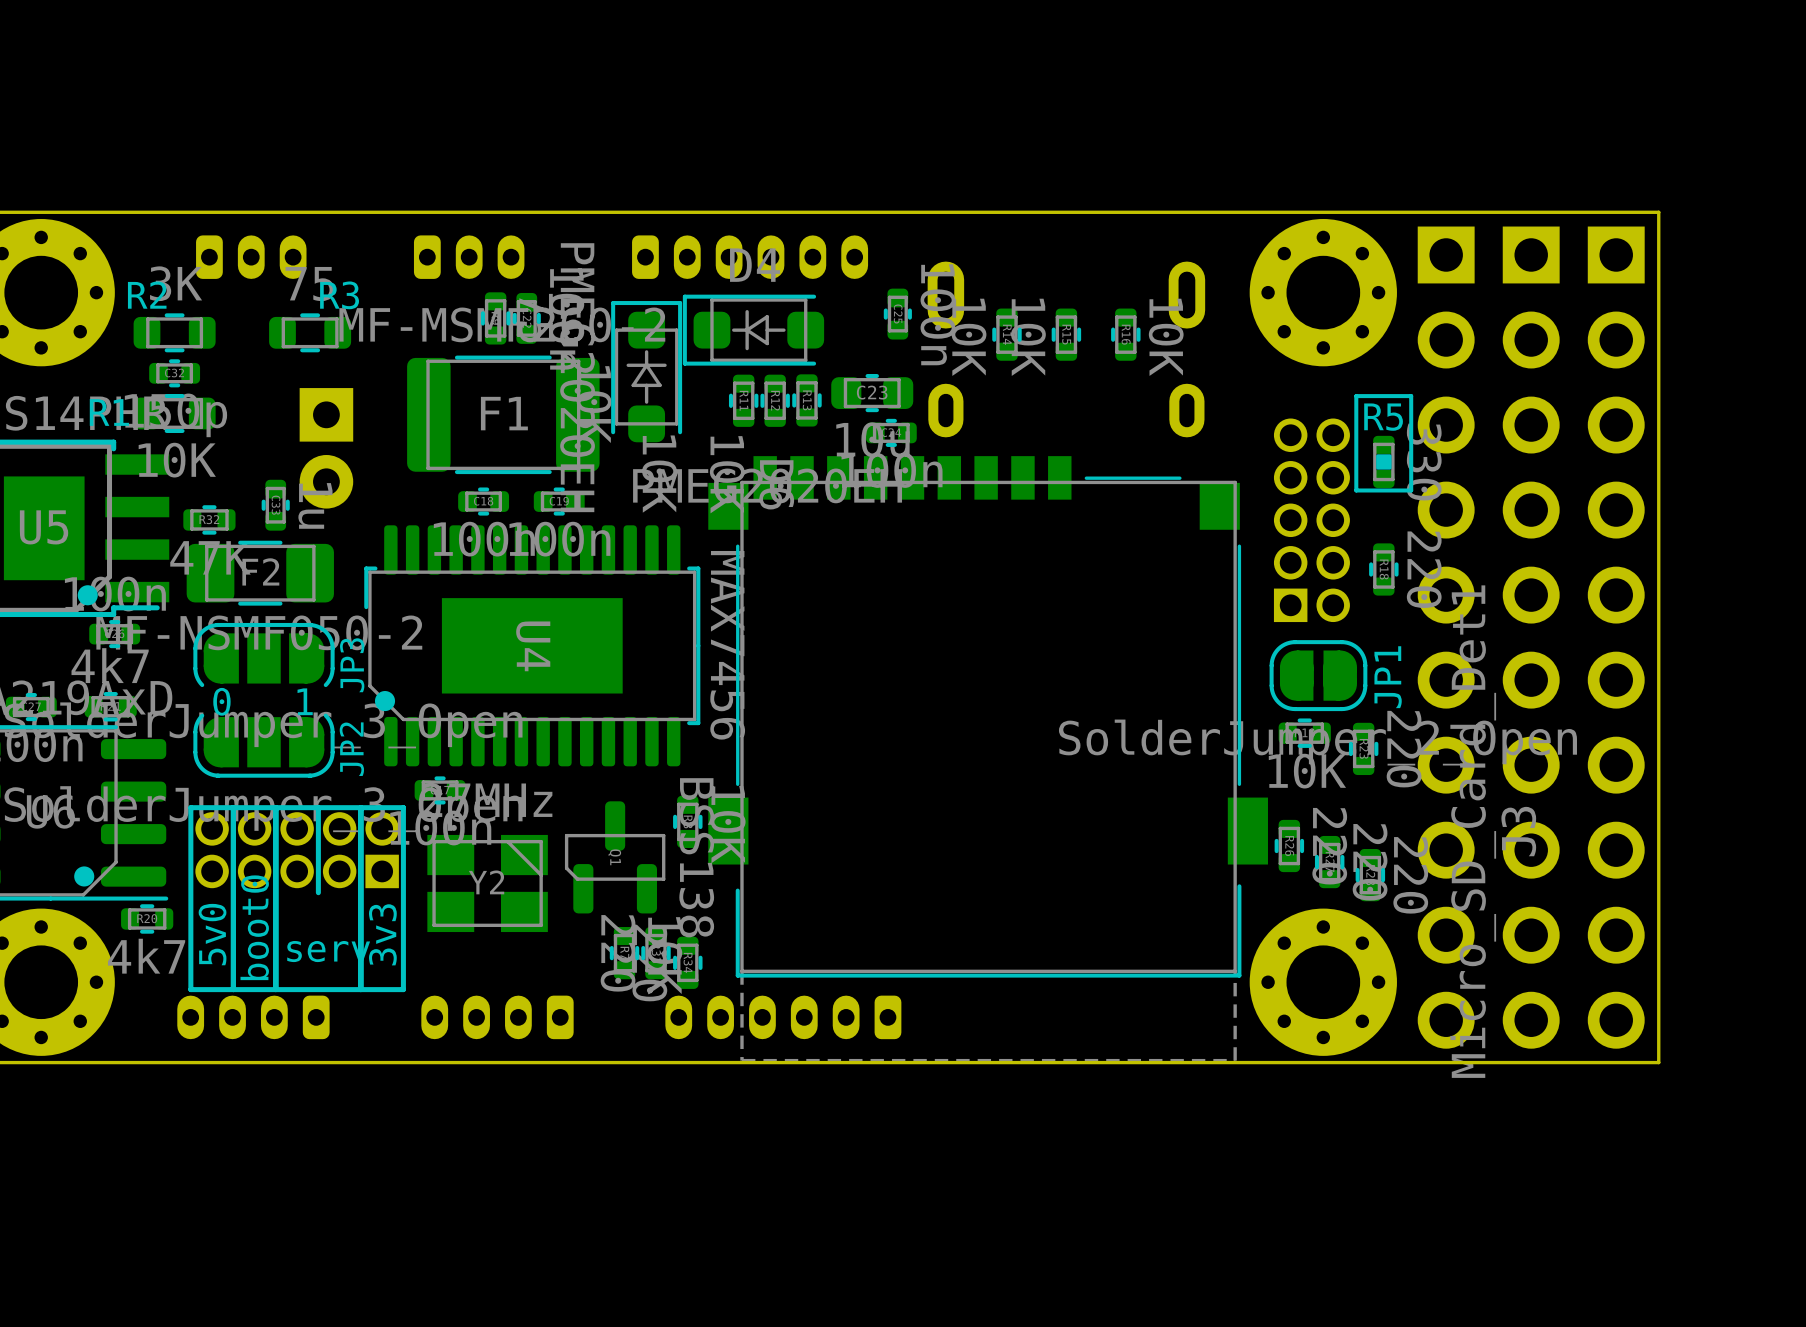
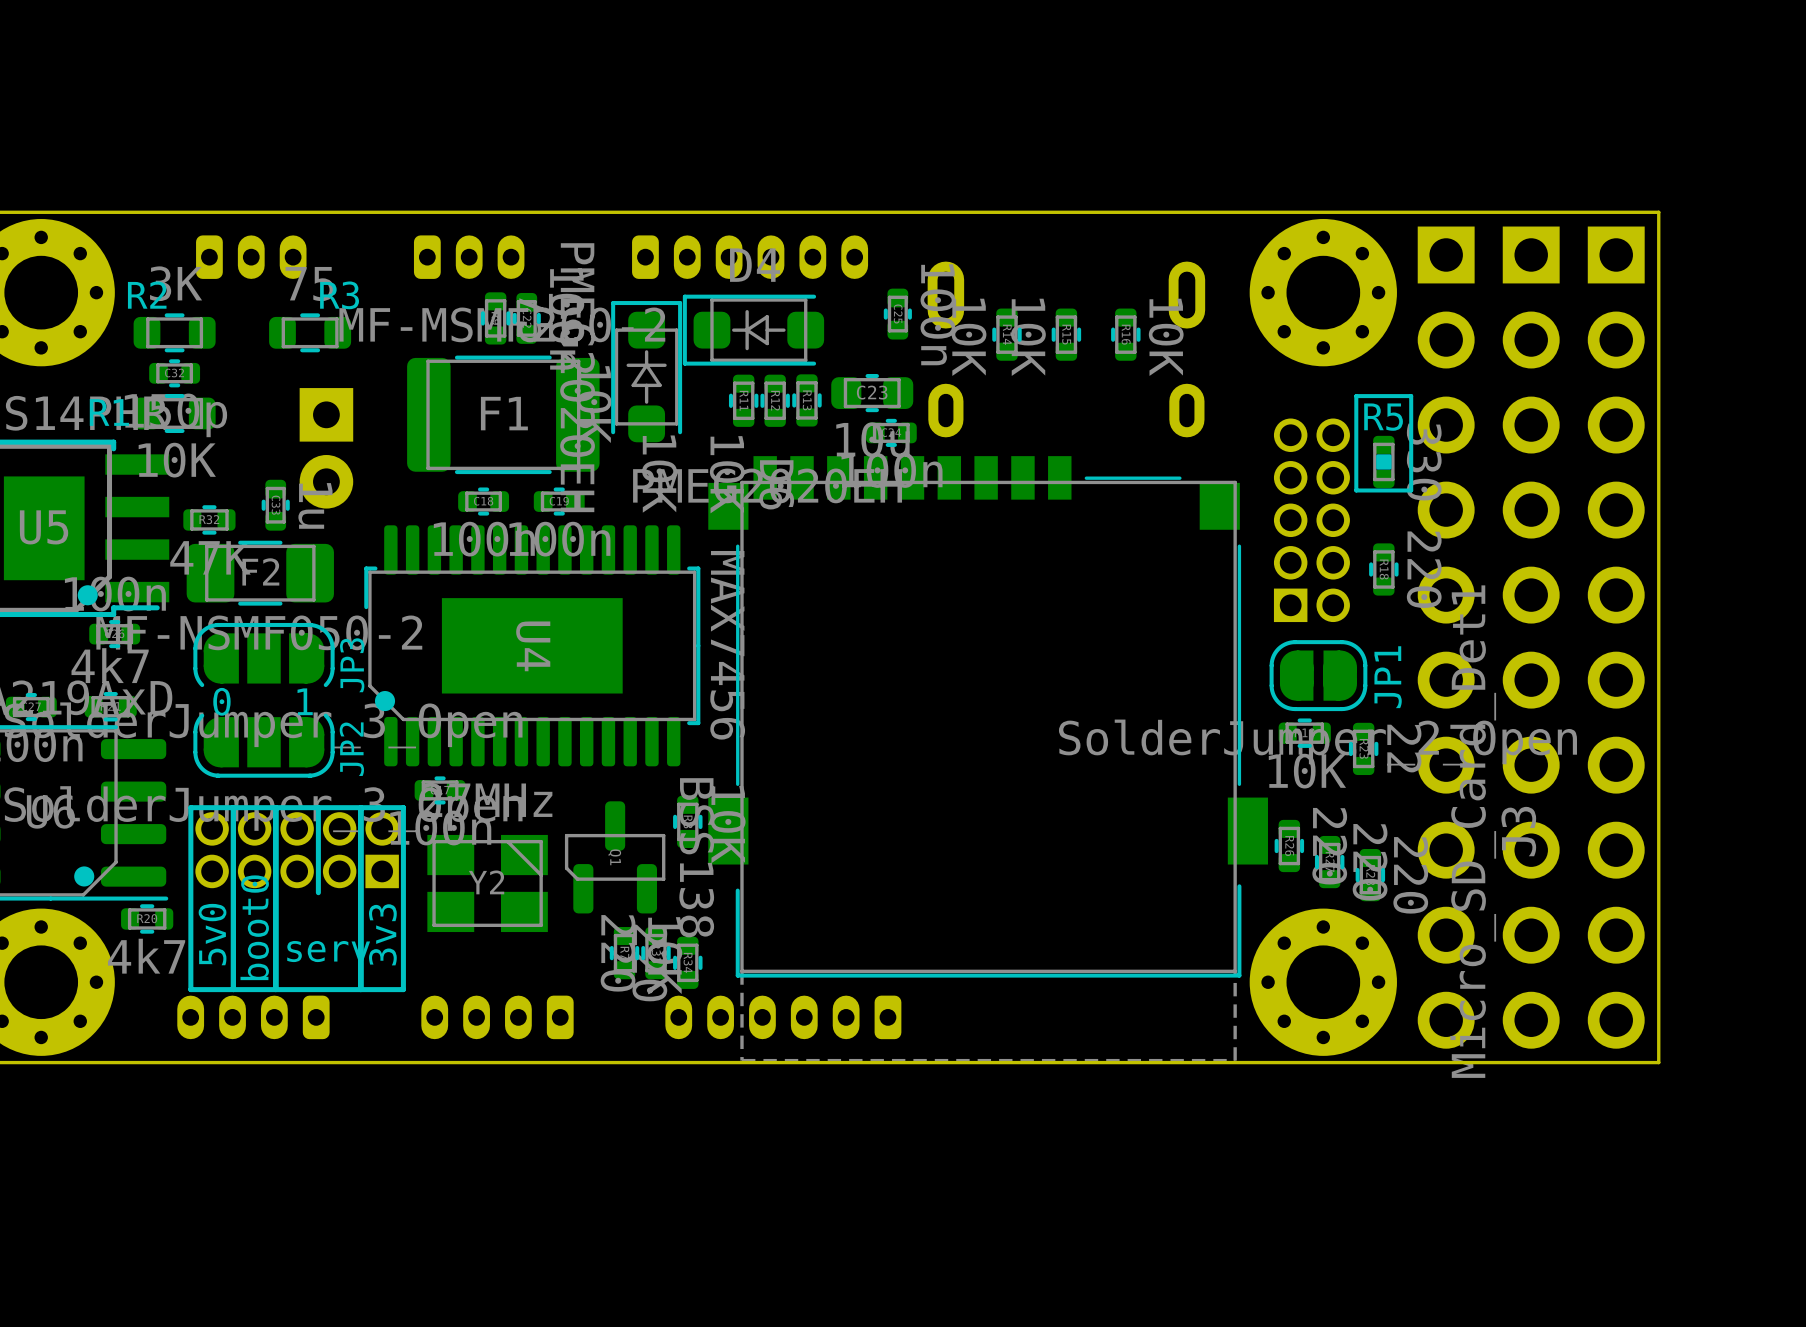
R23 value: 220 (1404, 749) -> 22 (1404, 748)

